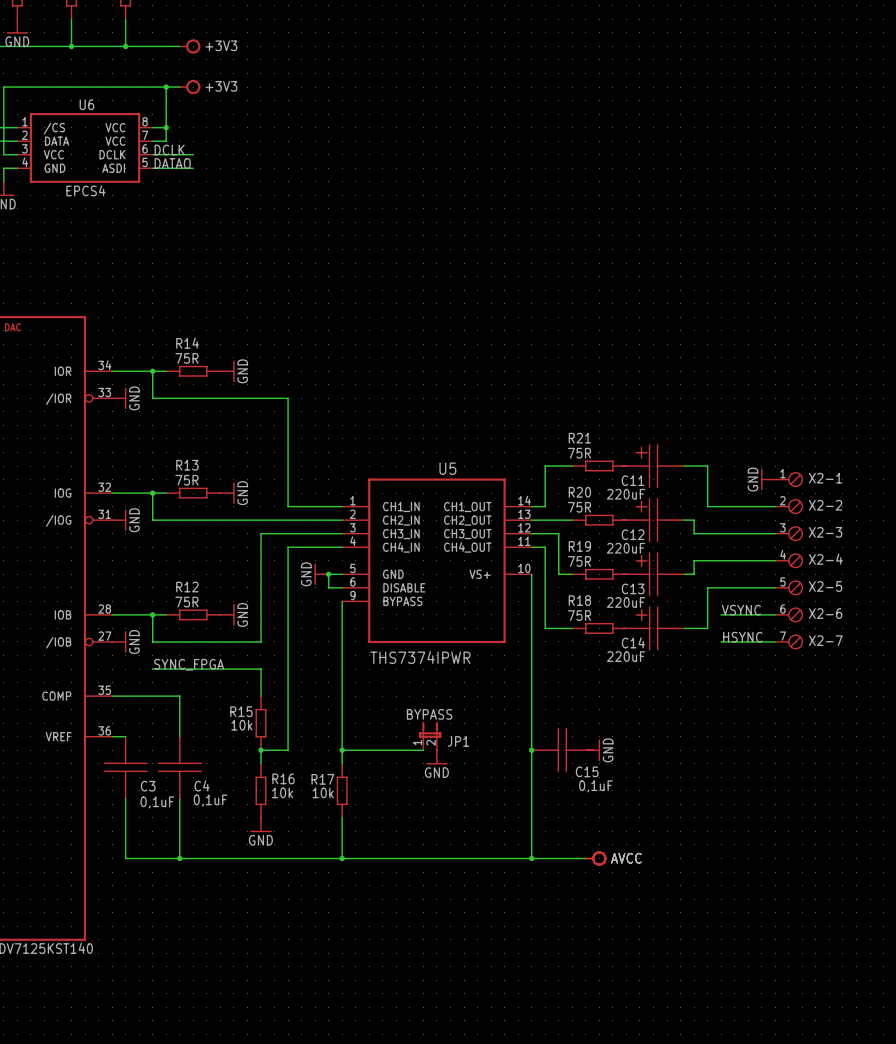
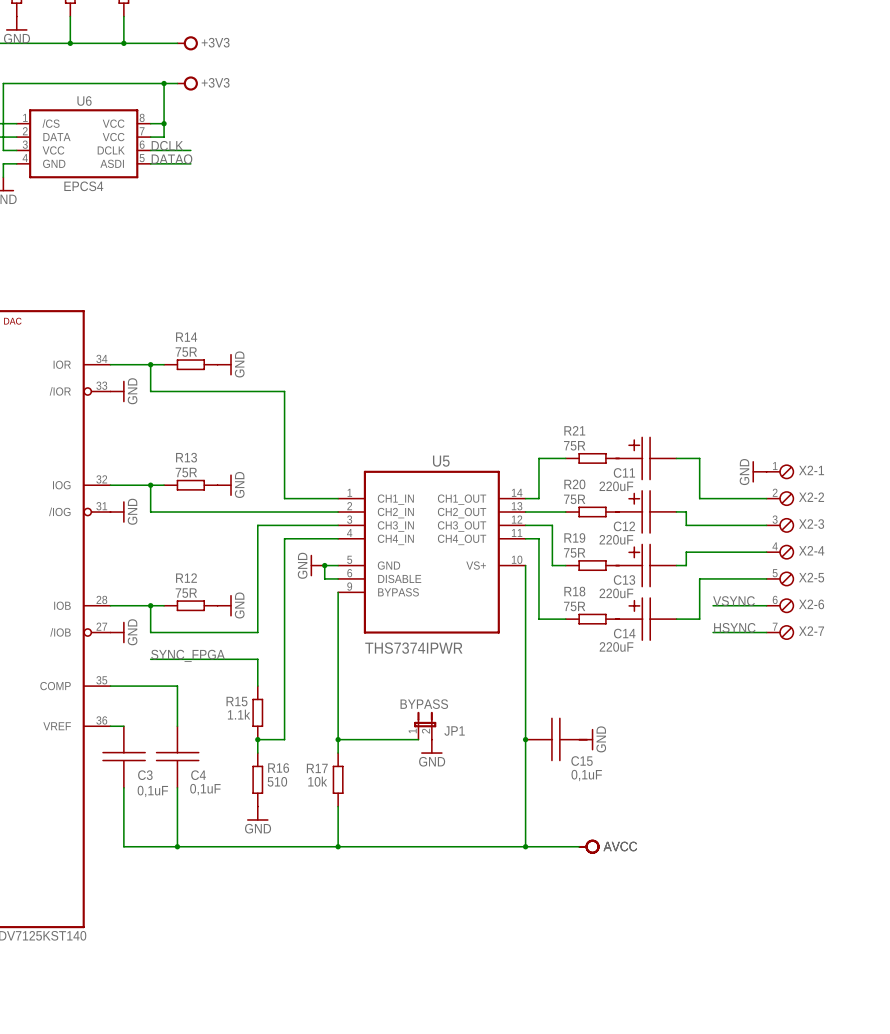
R15 value: 10k (241, 725) -> 1.1k (239, 714)
R16 value: 10k (282, 792) -> 510 (277, 781)

